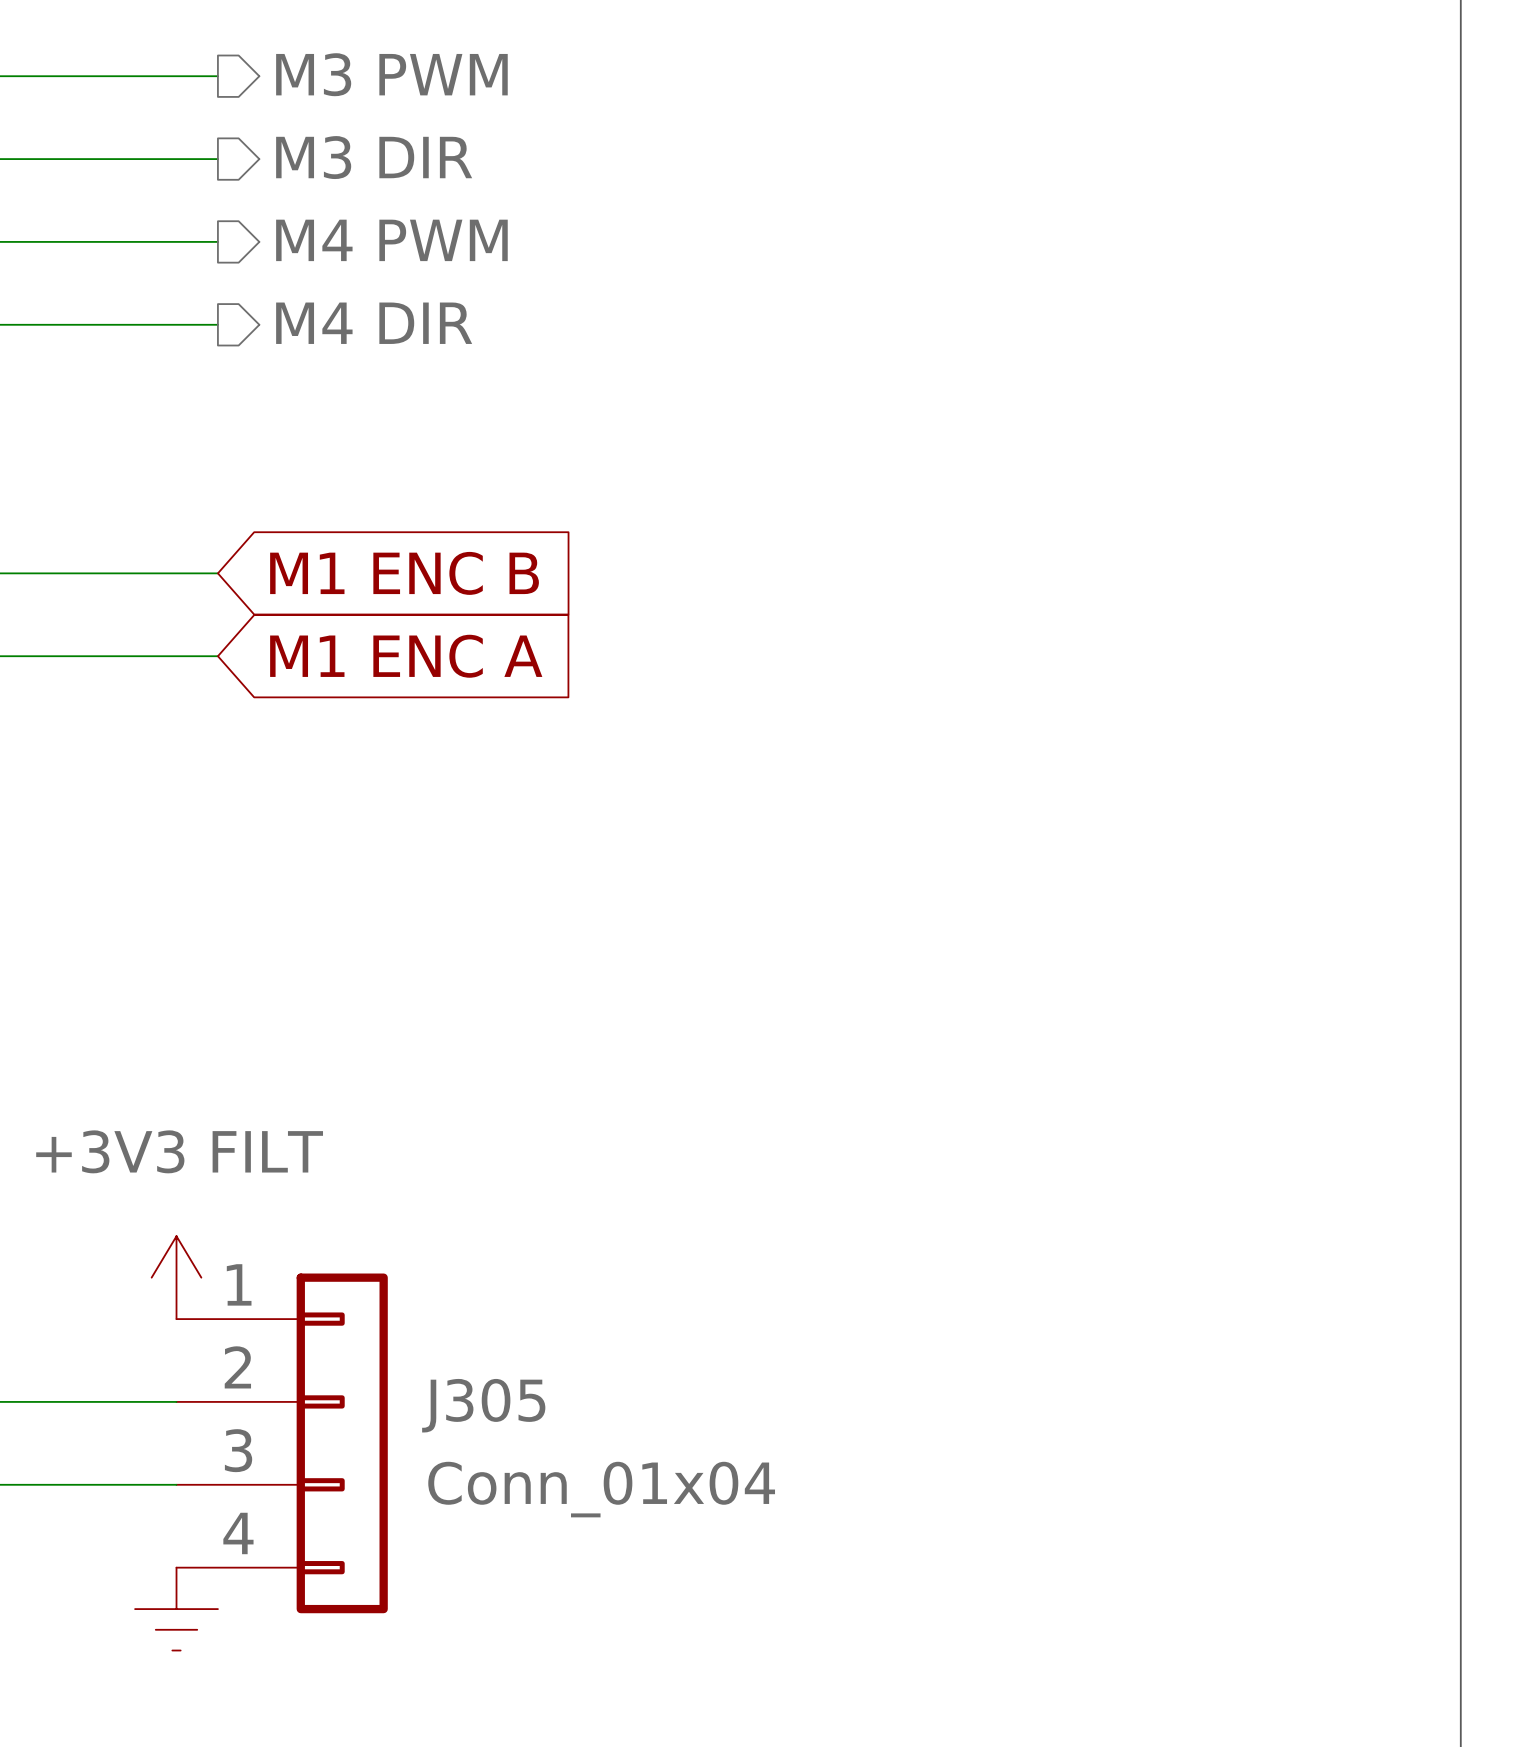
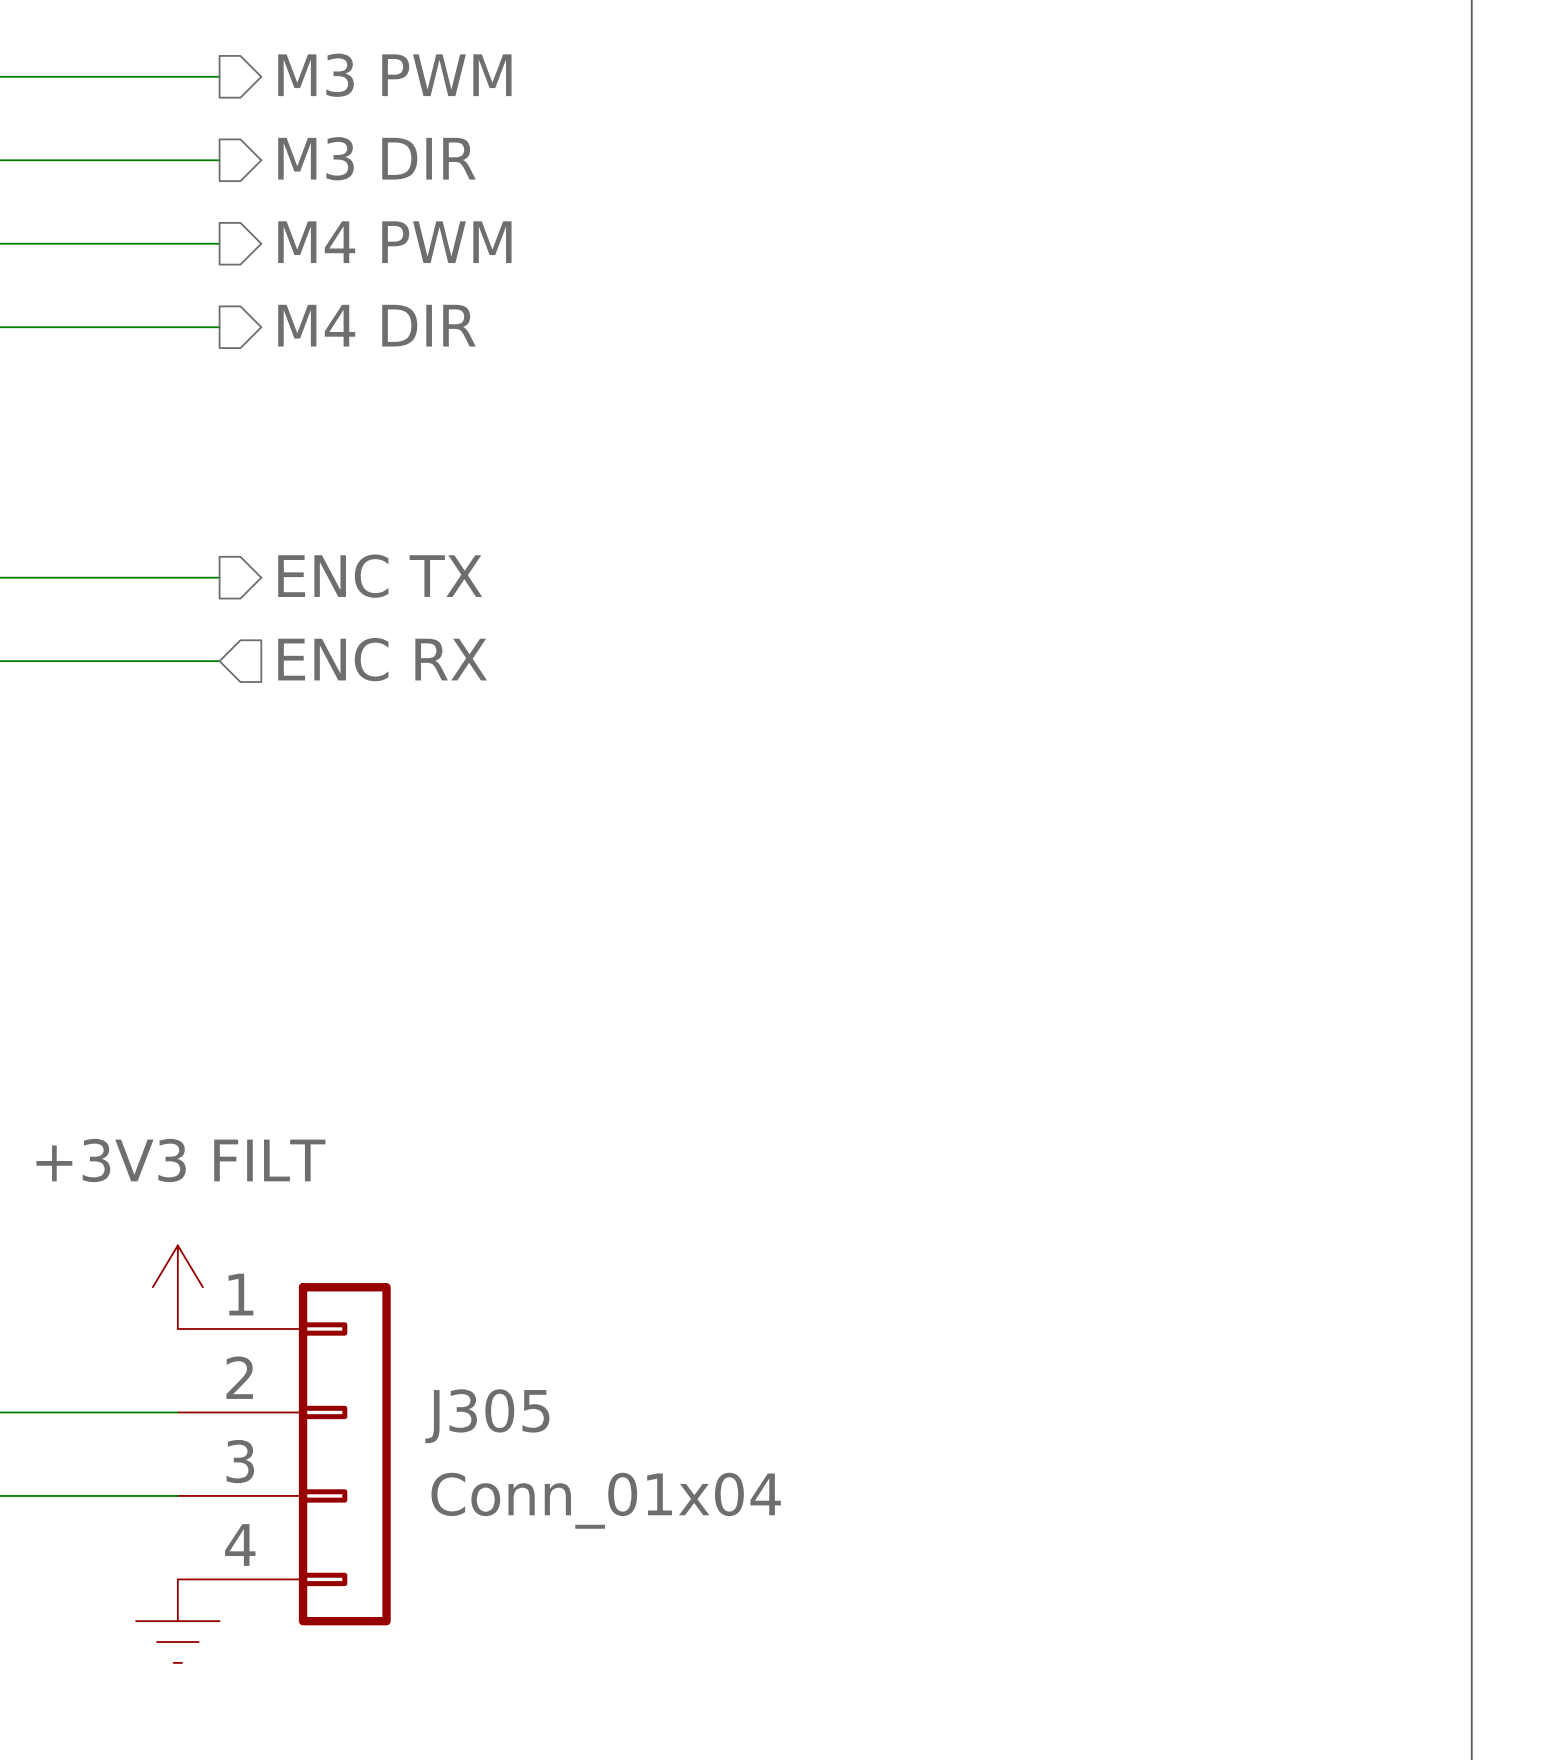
hierarchical label: none -> ENC TX (380, 576)
global label: M1 ENC B (404, 573) -> none
hierarchical label: none -> ENC RX (382, 659)
global label: M1 ENC A (406, 656) -> none

